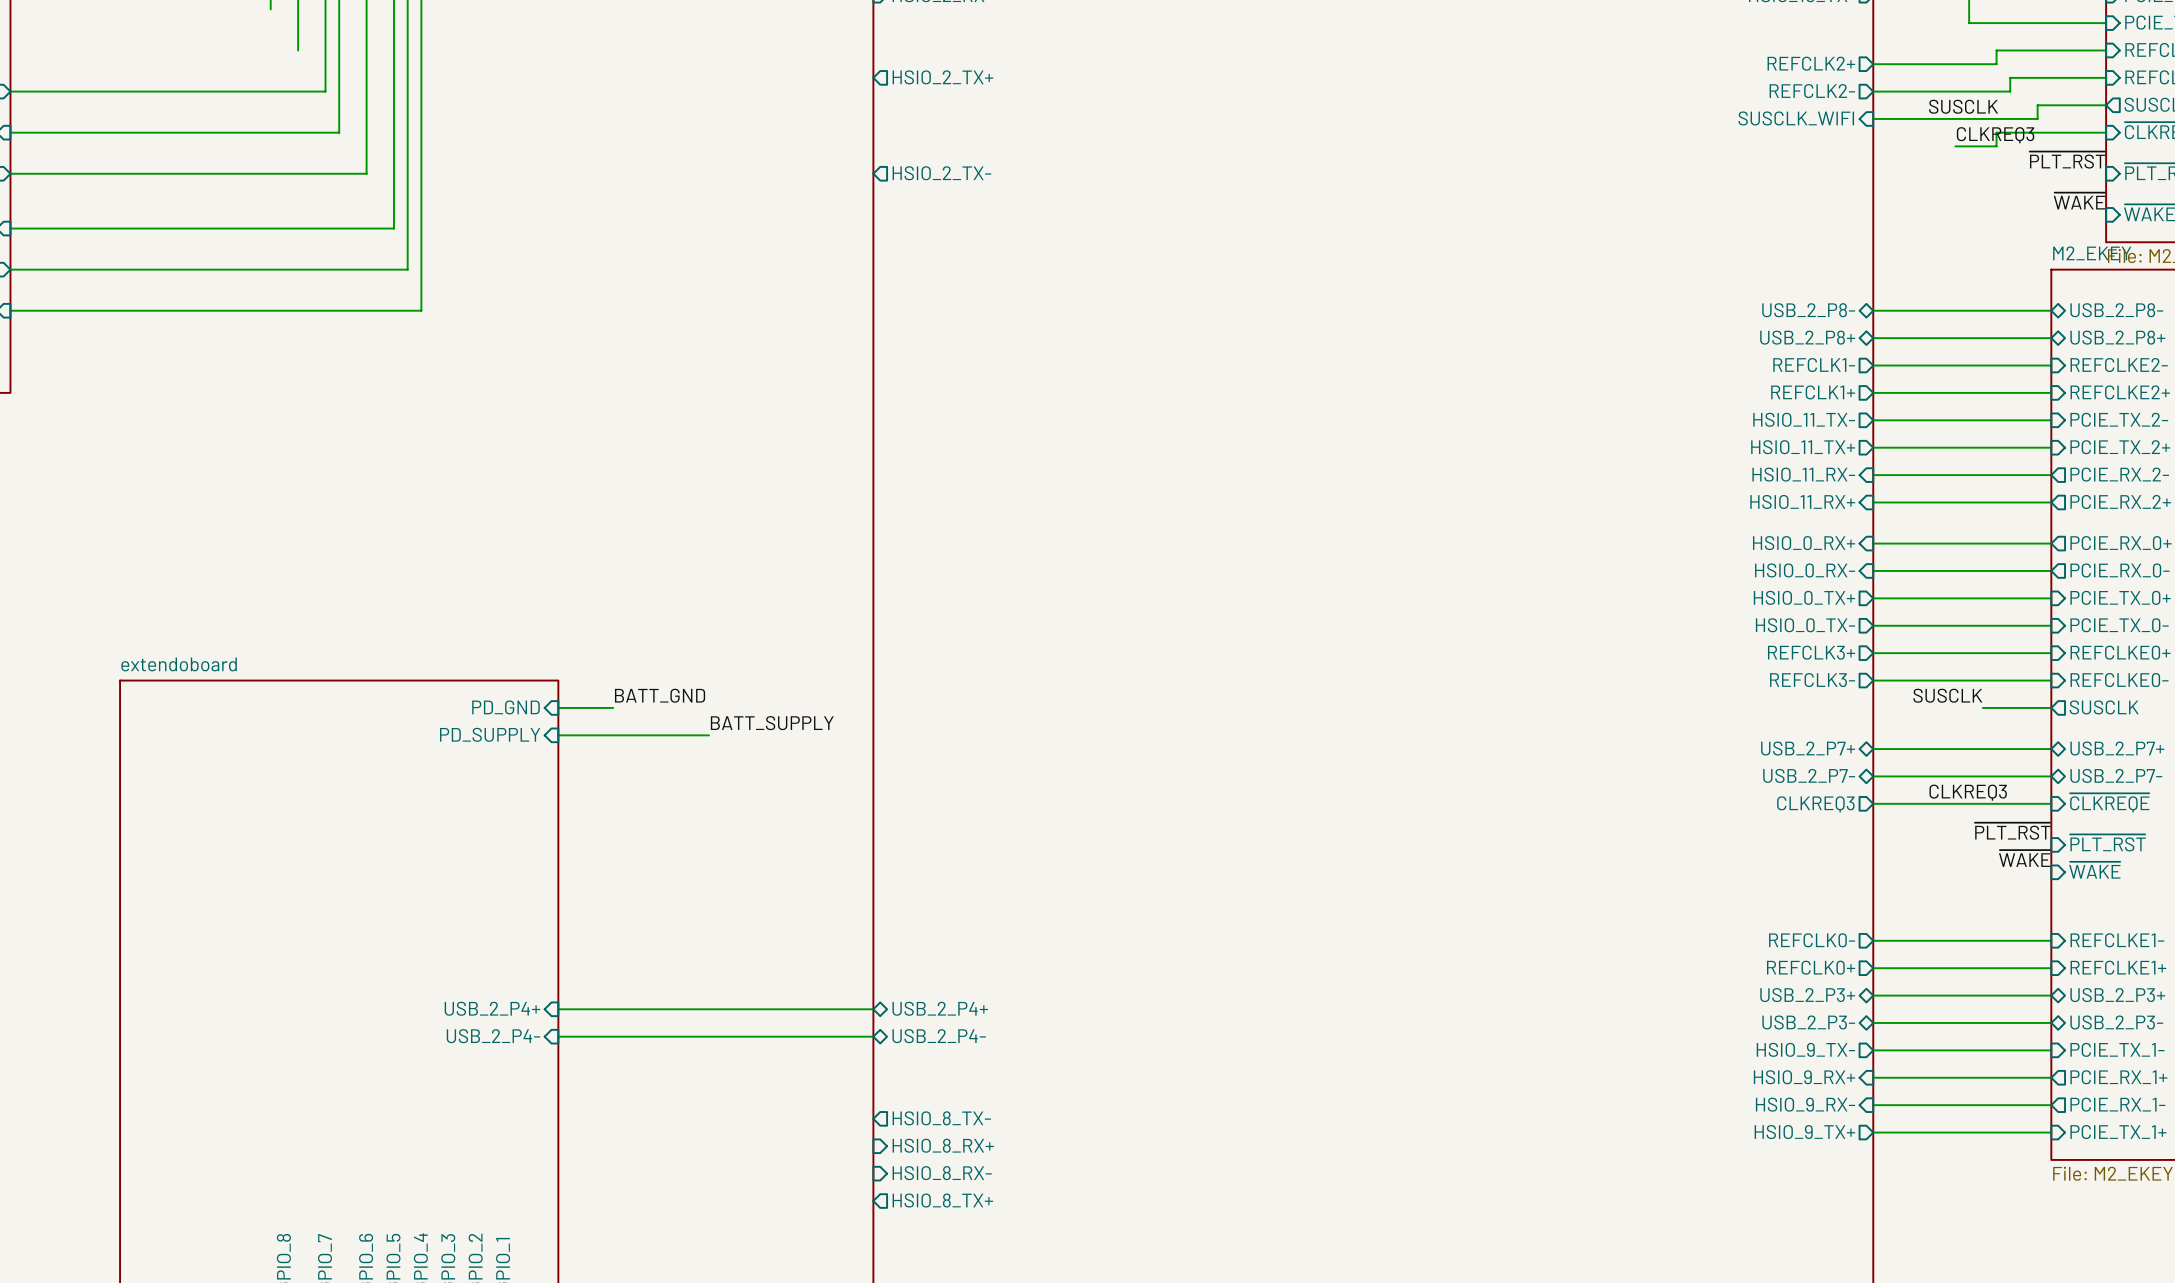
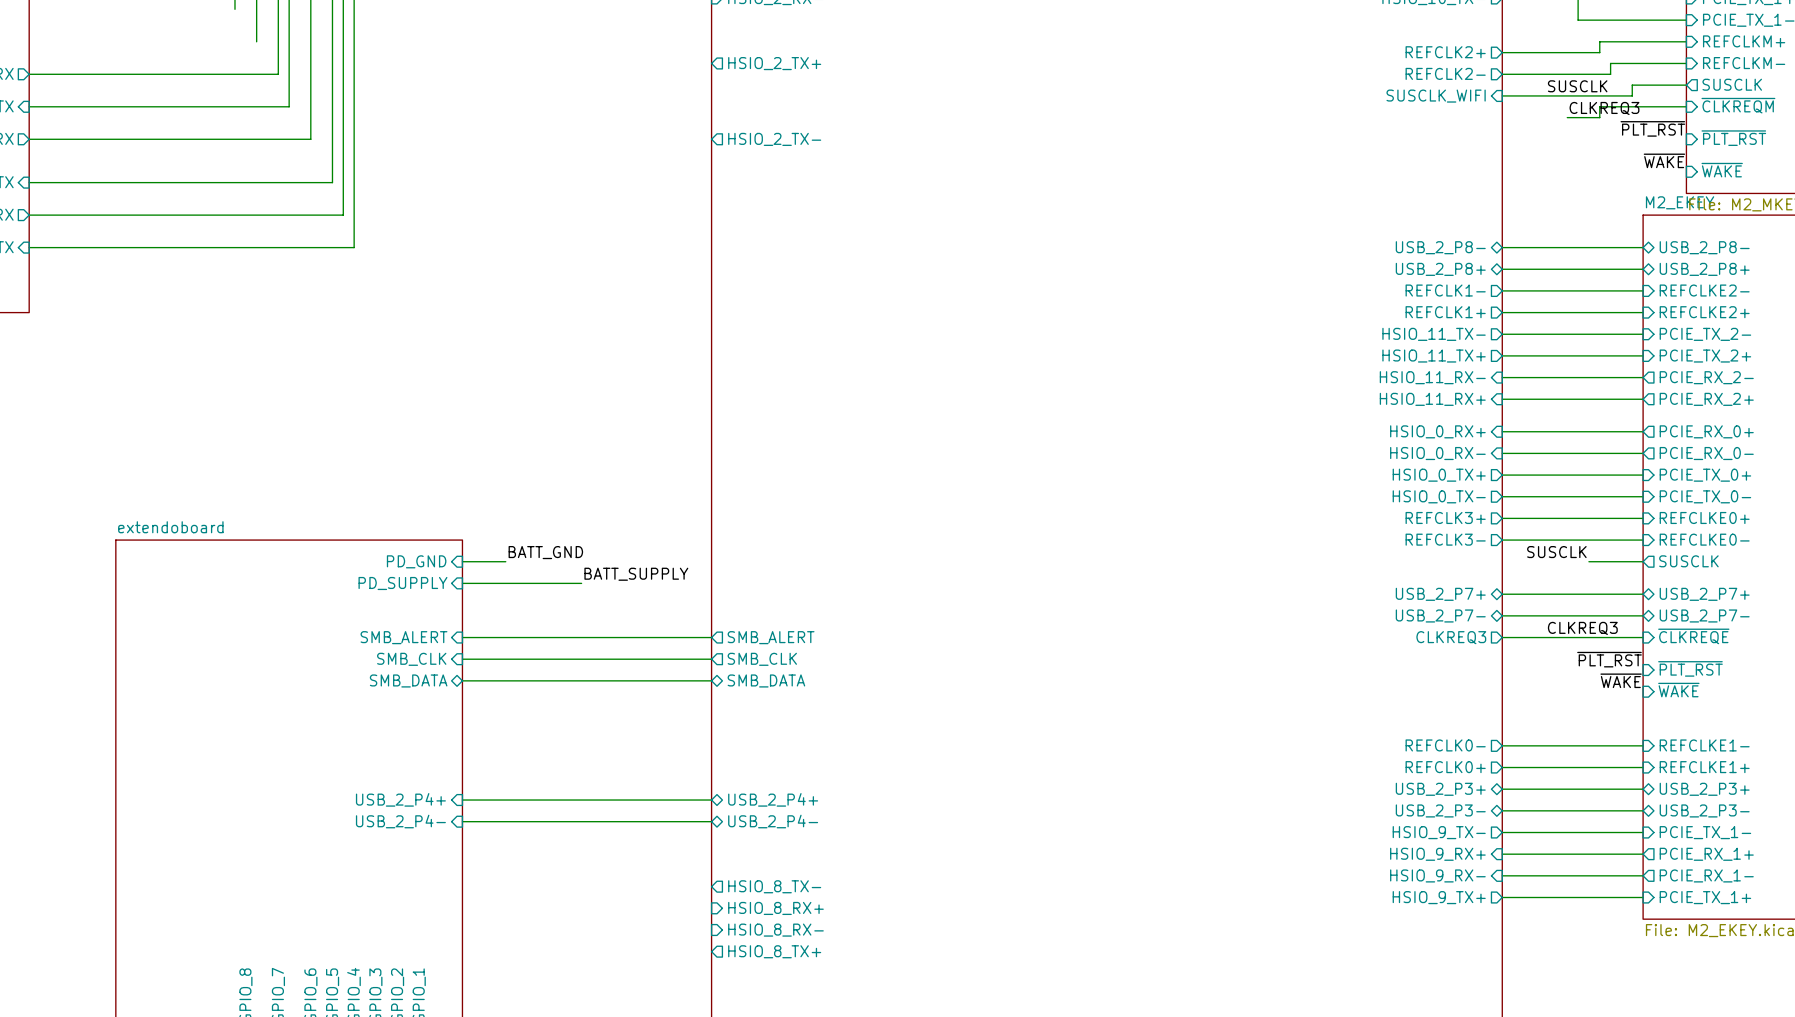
sheet pin: none -> SMB_ALERT (404, 637)
wire: none -> (462, 637) (711, 637)
sheet pin: none -> SMB_ALERT (771, 637)
sheet pin: none -> SMB_CLK (411, 659)
sheet pin: none -> SMB_CLK (762, 659)
wire: none -> (462, 659) (711, 659)
sheet pin: none -> SMB_DATA (408, 680)
wire: none -> (462, 680) (711, 680)
sheet pin: none -> SMB_DATA (766, 680)

